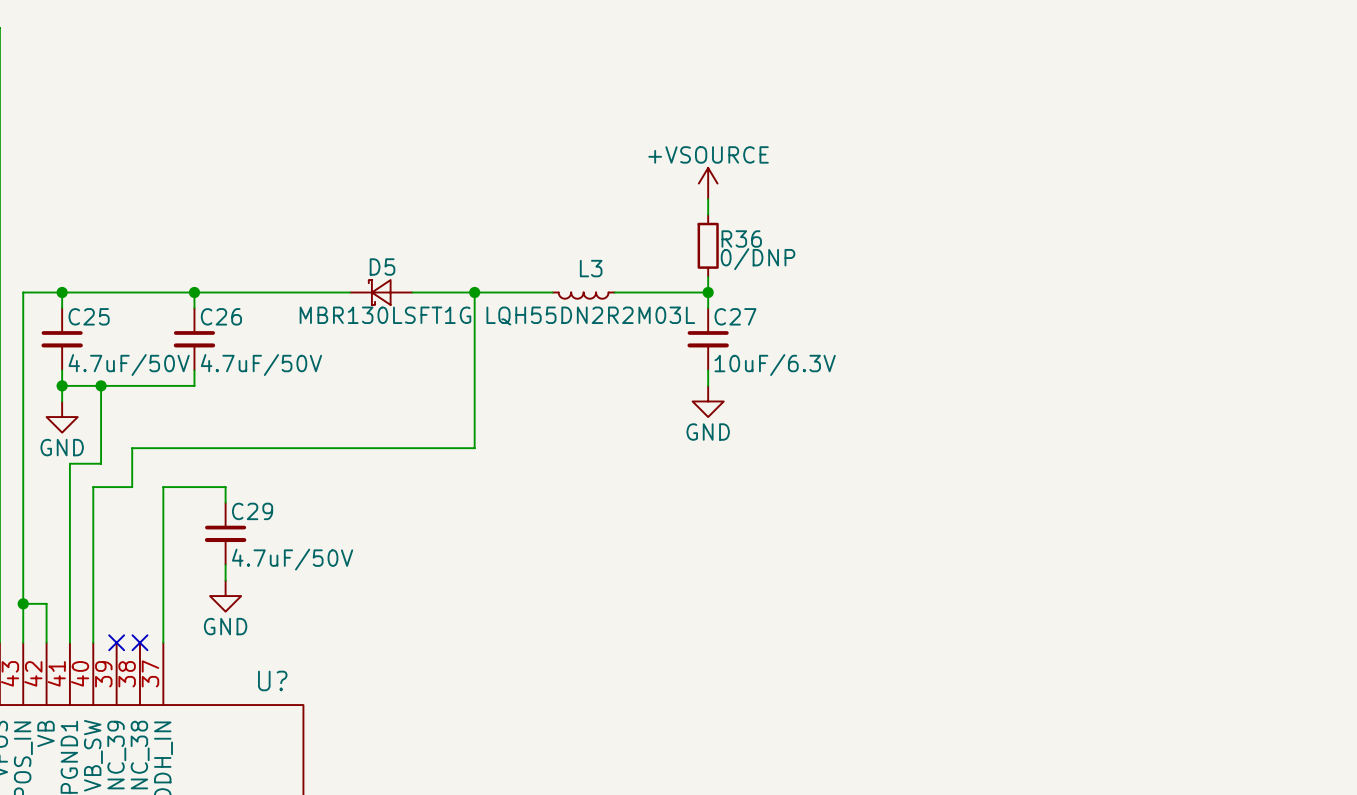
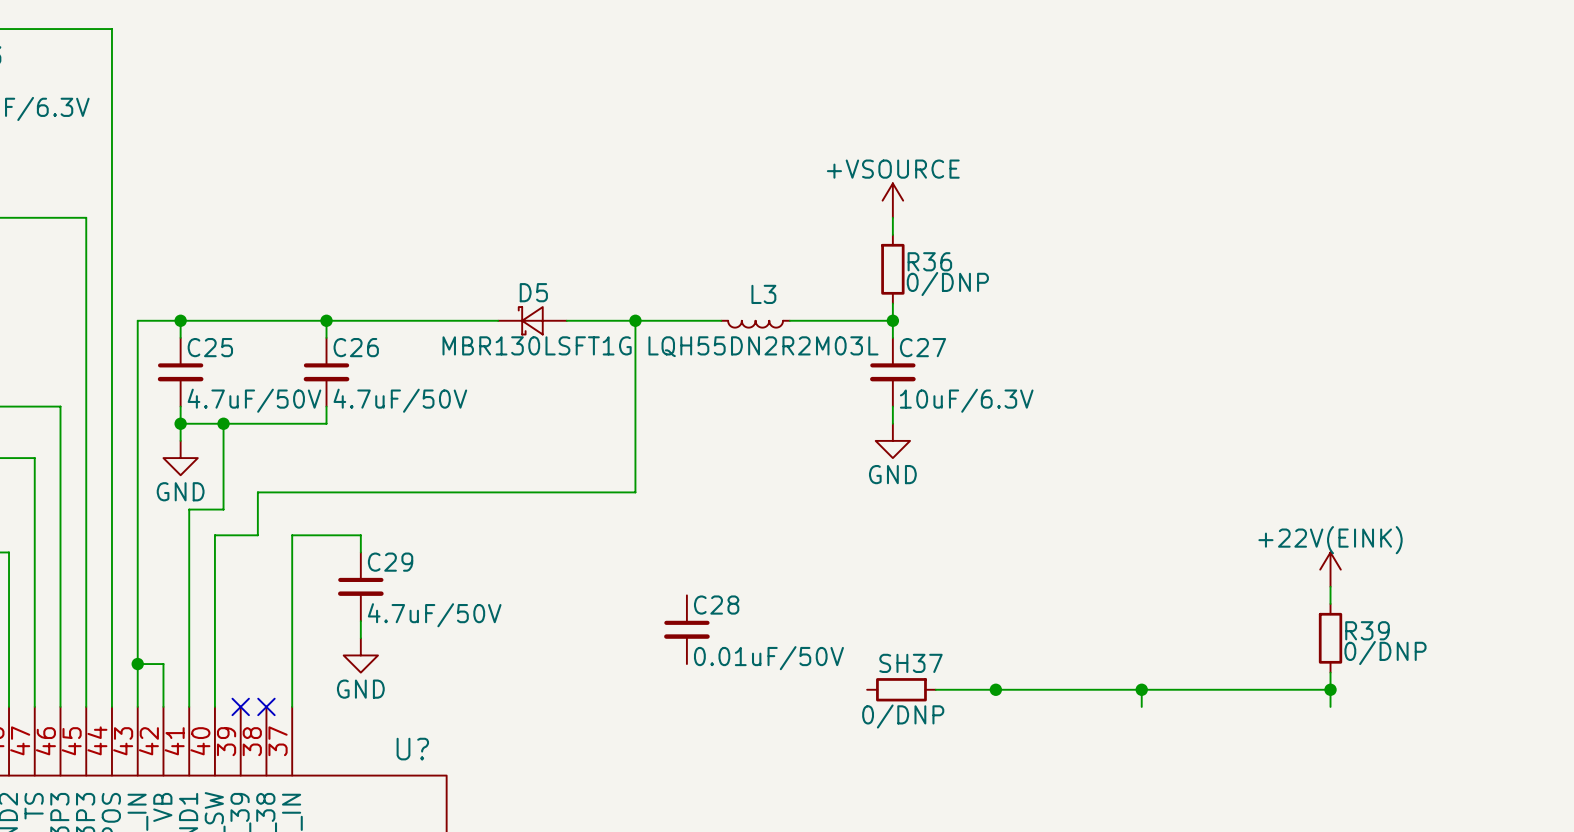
power symbol: none -> +22V(EINK) (1330, 569)
wire: none -> (1330, 586) (1330, 603)
C28: none -> 0.01uF/50V (686, 629)
R39: none -> 0/DNP (1330, 638)
wire: none -> (1330, 672) (1330, 706)
SH37: none -> 0/DNP (901, 689)
wire: none -> (935, 689) (1330, 689)
junction: none -> (995, 689)
wire: none -> (1141, 689) (1141, 706)
junction: none -> (1141, 689)
junction: none -> (1330, 689)

